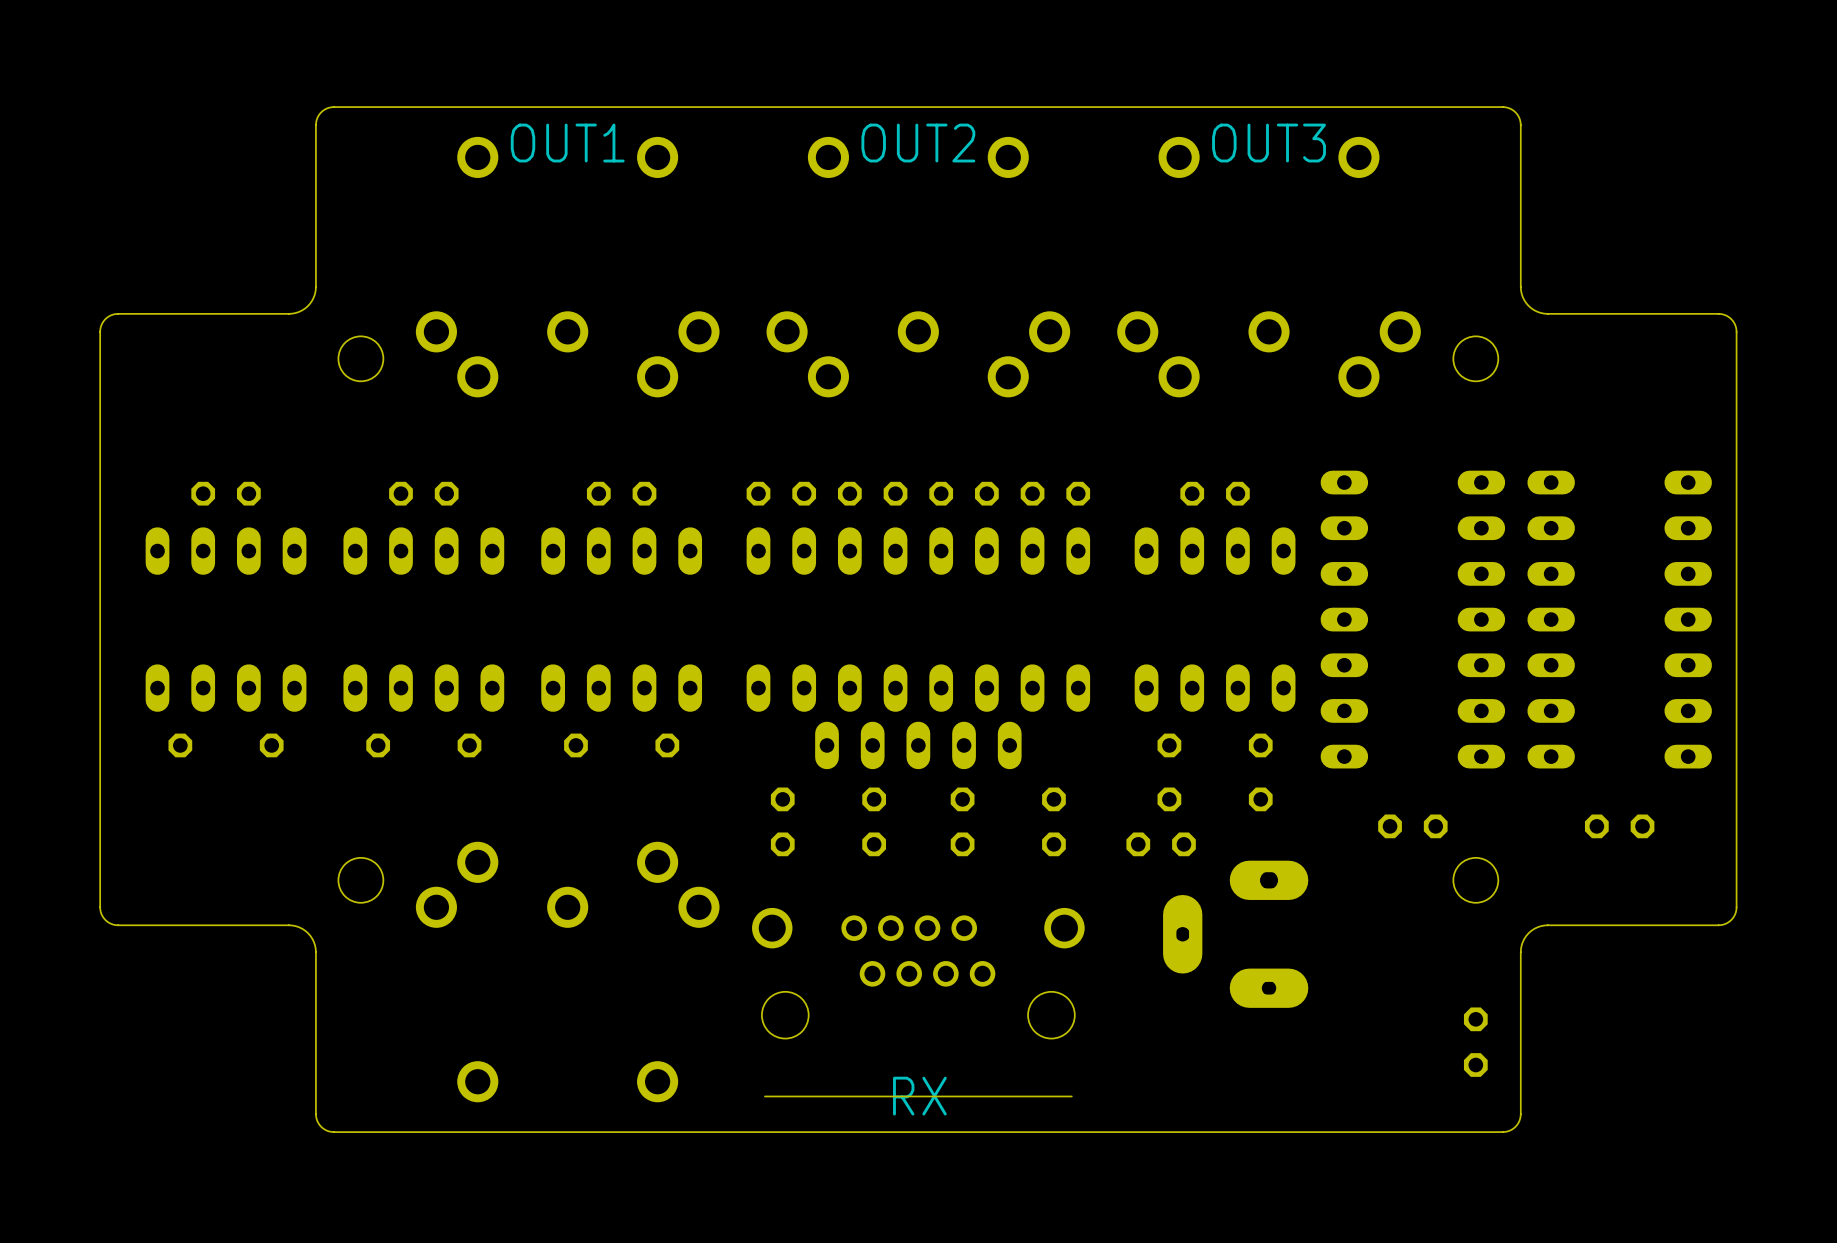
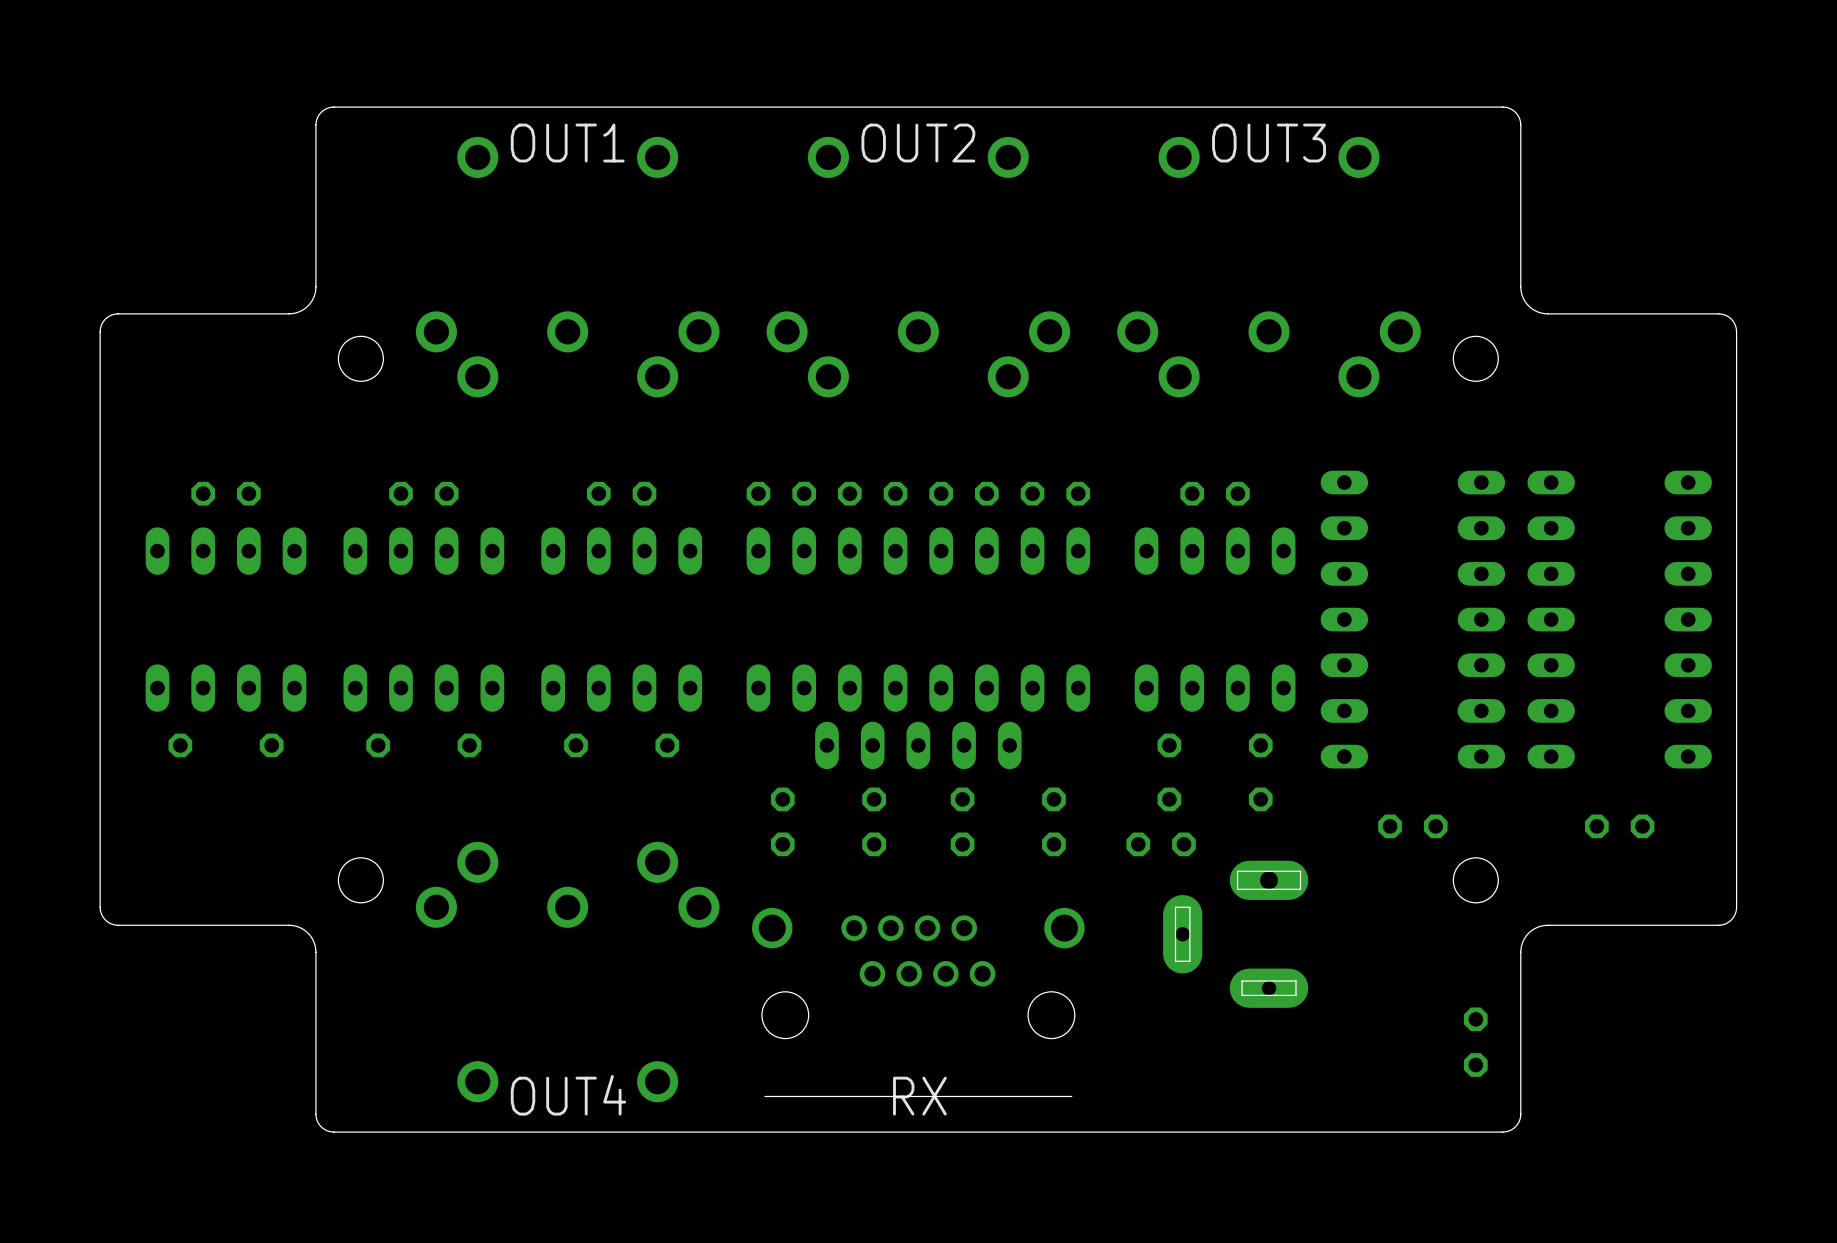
text: none -> OUT4 (568, 1095)

